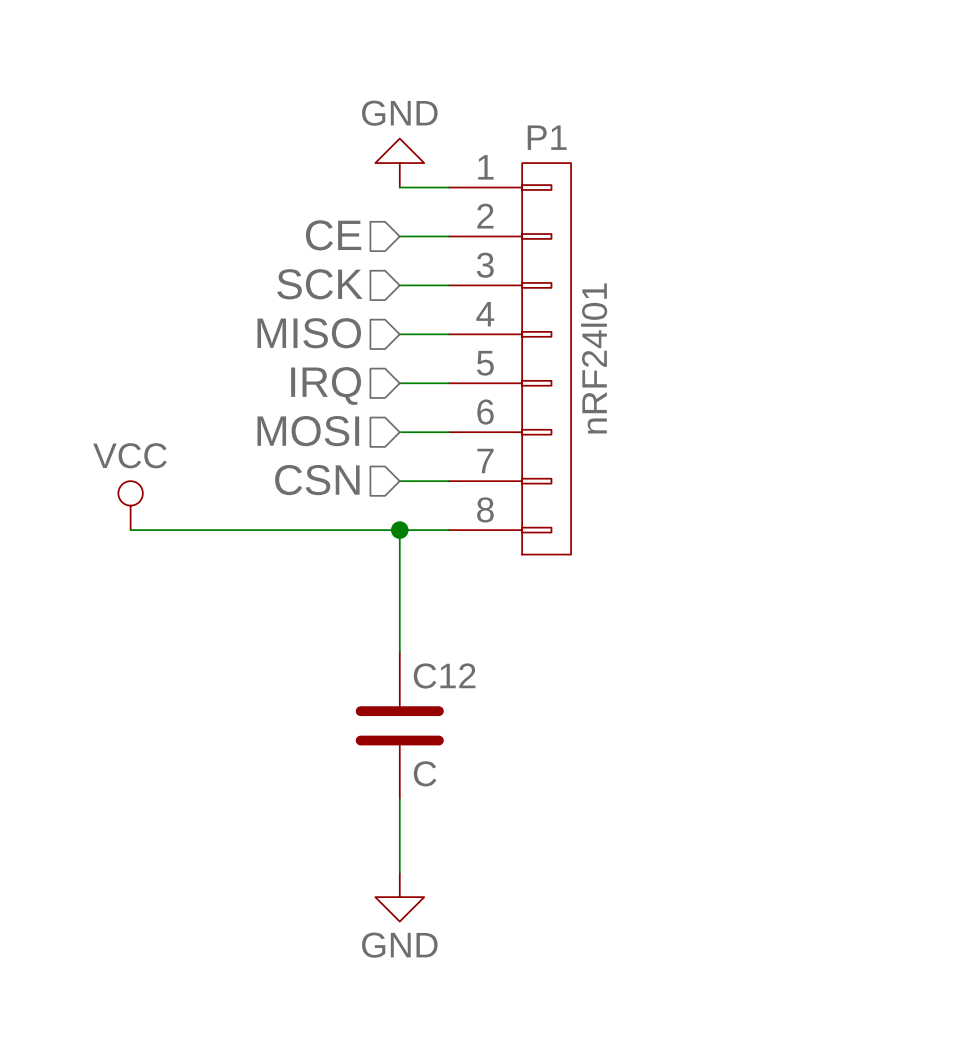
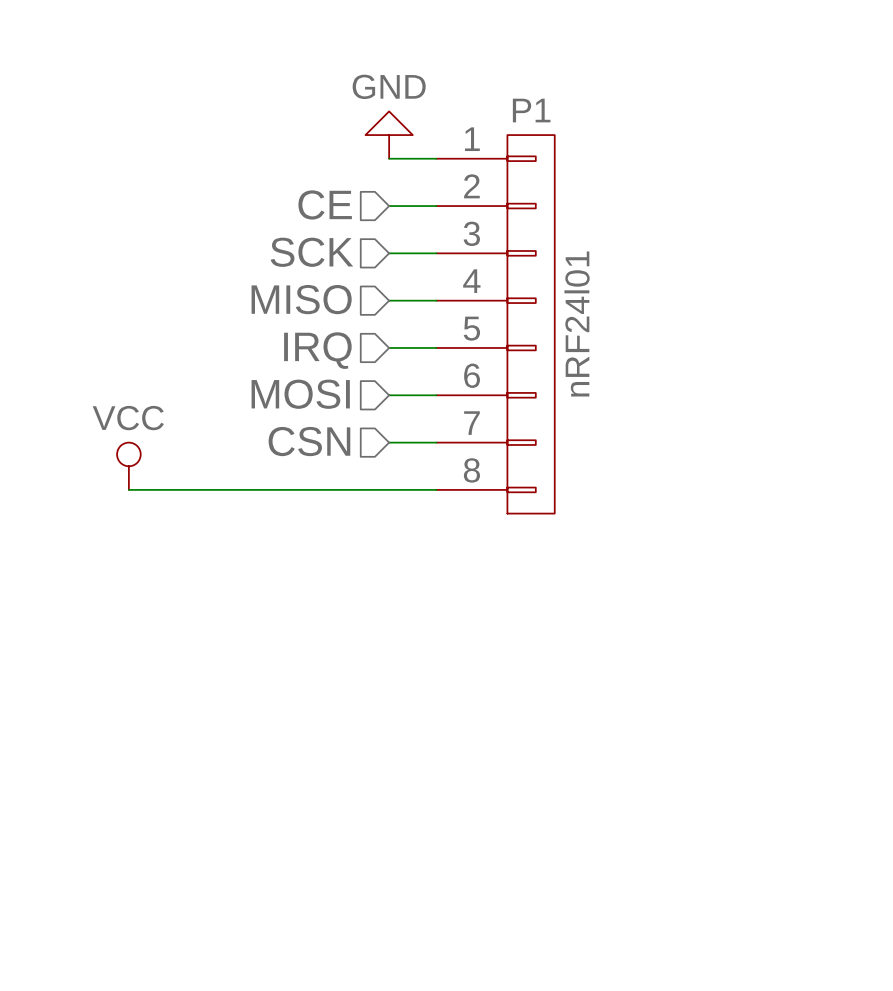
wire: (399, 530) (399, 652) -> none
junction: (399, 530) -> none
C12: C (399, 725) -> none
wire: (399, 799) (399, 872) -> none
power symbol: GND (399, 897) -> none

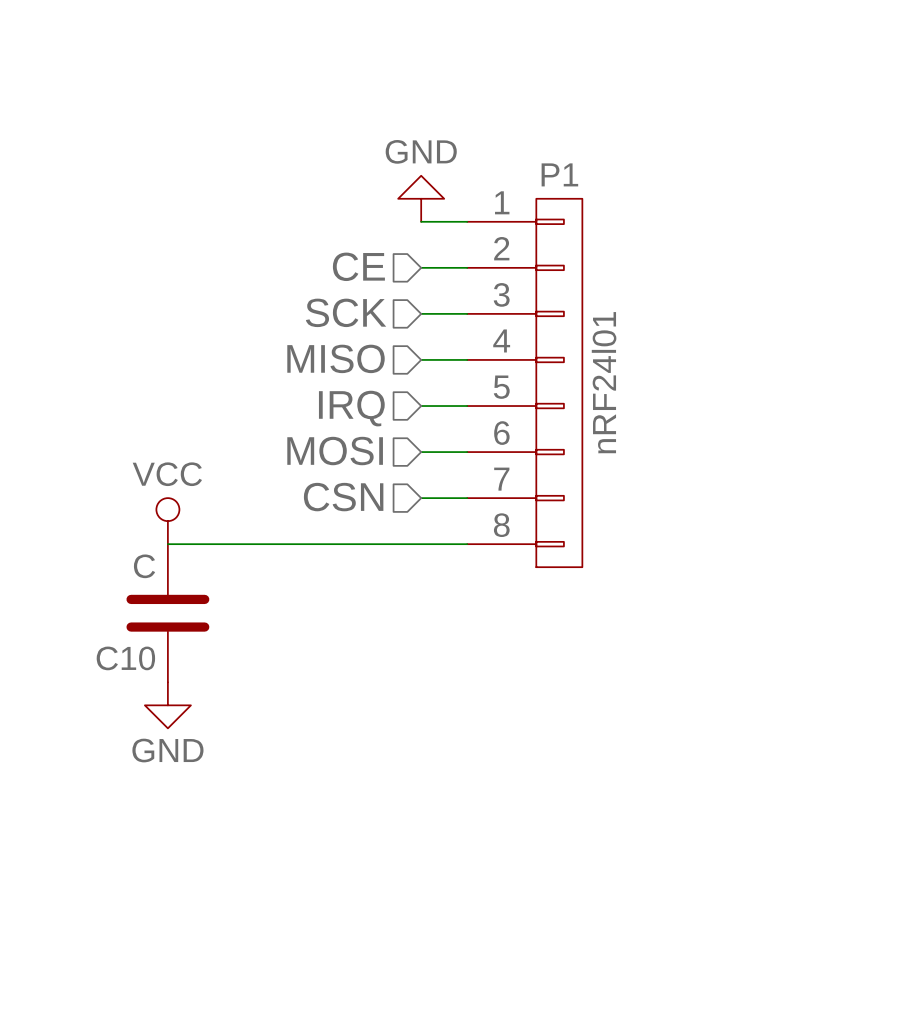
C10: none -> C (167, 613)
power symbol: none -> GND (167, 705)

